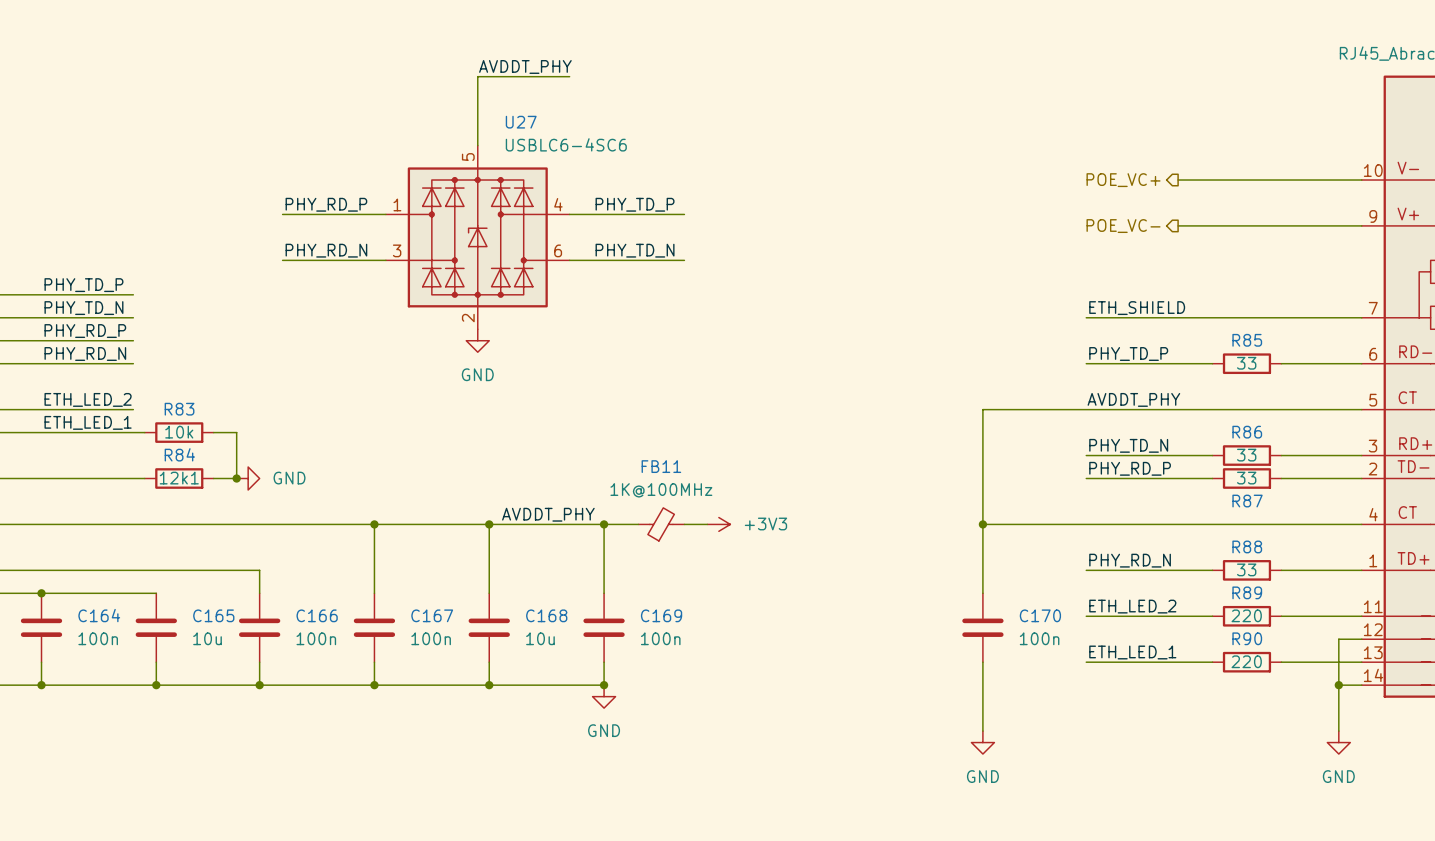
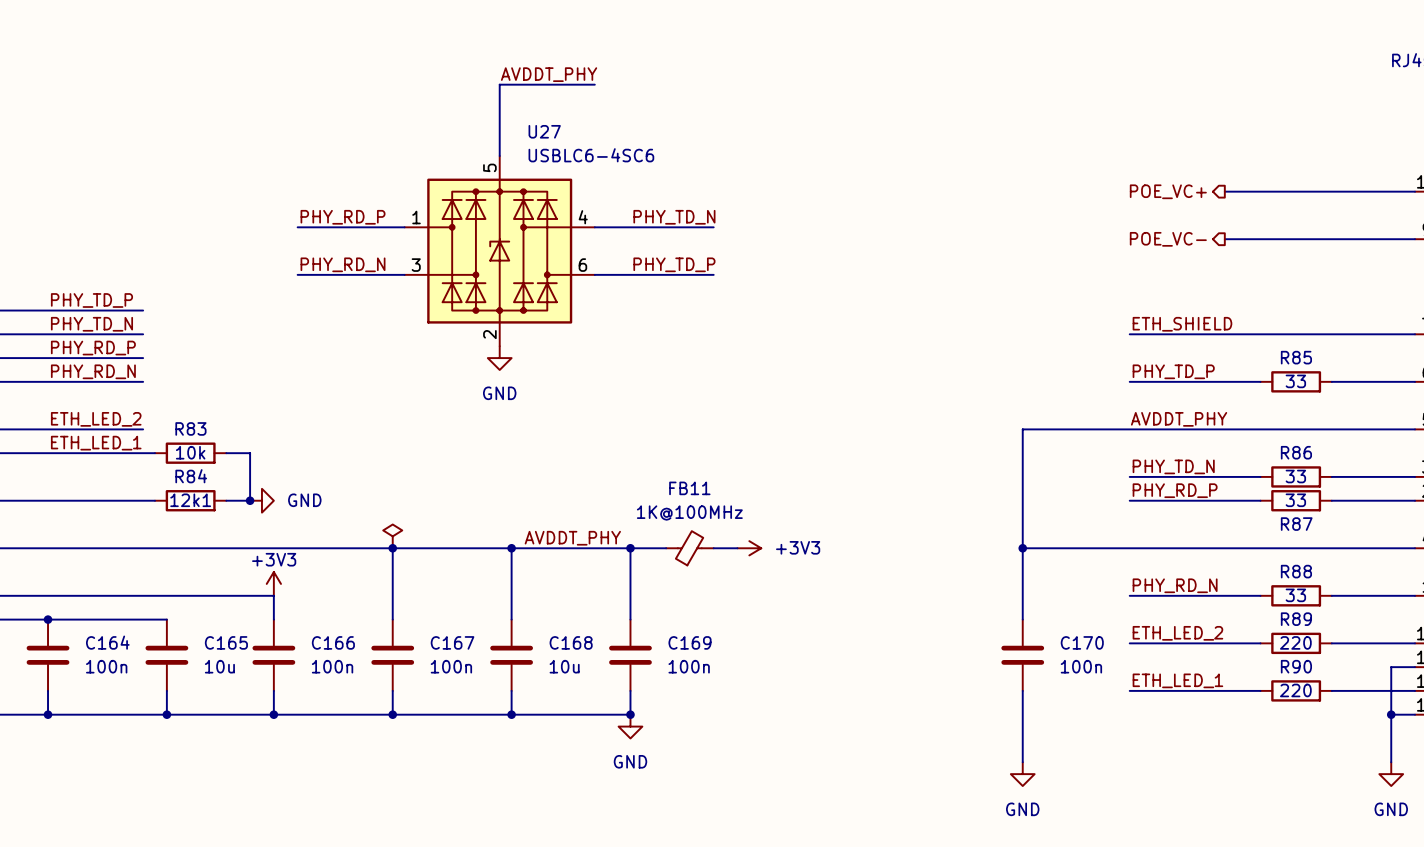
label position: PHY_TD_P (635, 204) -> PHY_TD_P (674, 264)
label position: PHY_TD_N (635, 250) -> PHY_TD_N (674, 217)
power symbol: none -> (392, 536)
power symbol: none -> +3V3 (273, 583)

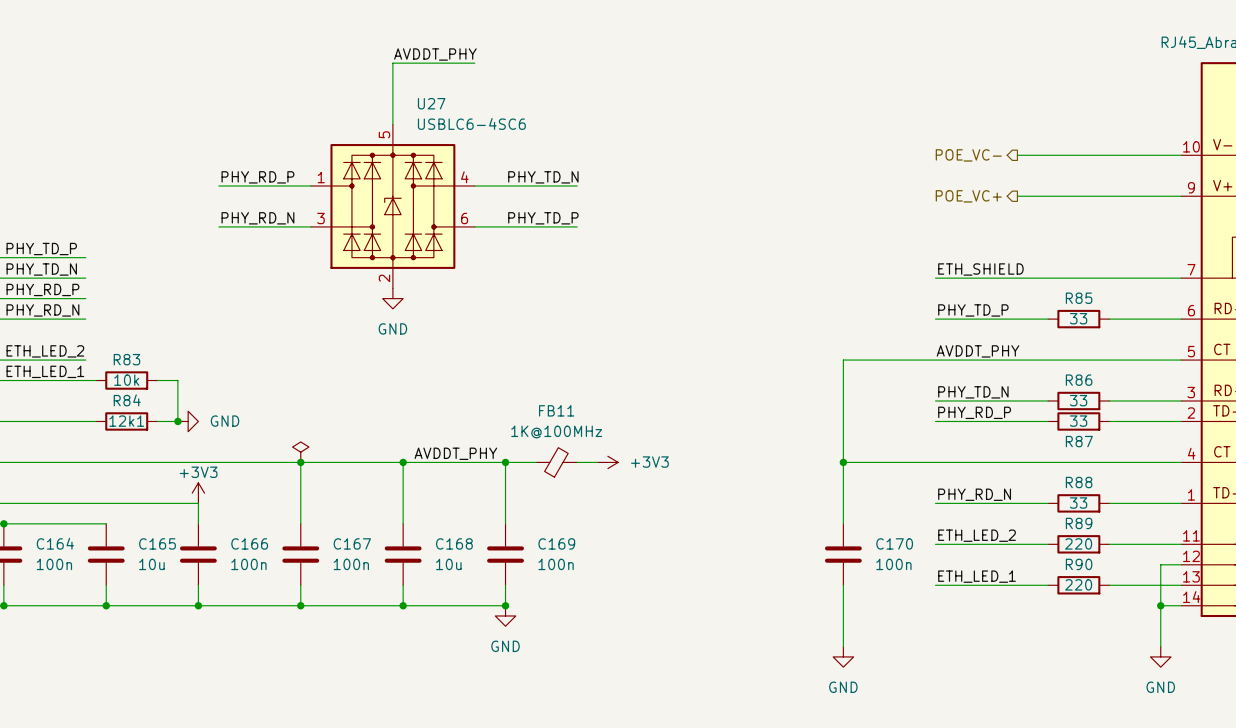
hierarchical label: POE_VC+ (1168, 191) -> POE_VC- (968, 155)
hierarchical label: POE_VC- (1168, 239) -> POE_VC+ (968, 196)

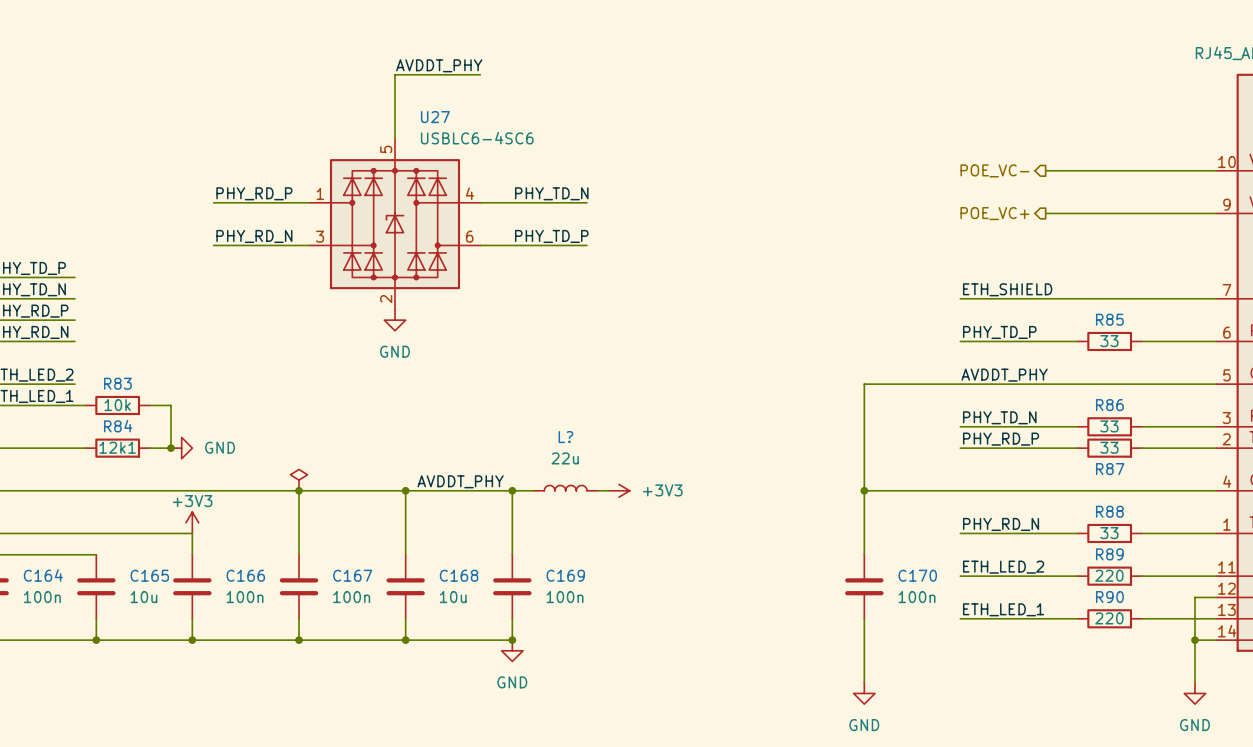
L?: none -> 22u (565, 488)
FB11: 1K@100MHz (556, 462) -> none

